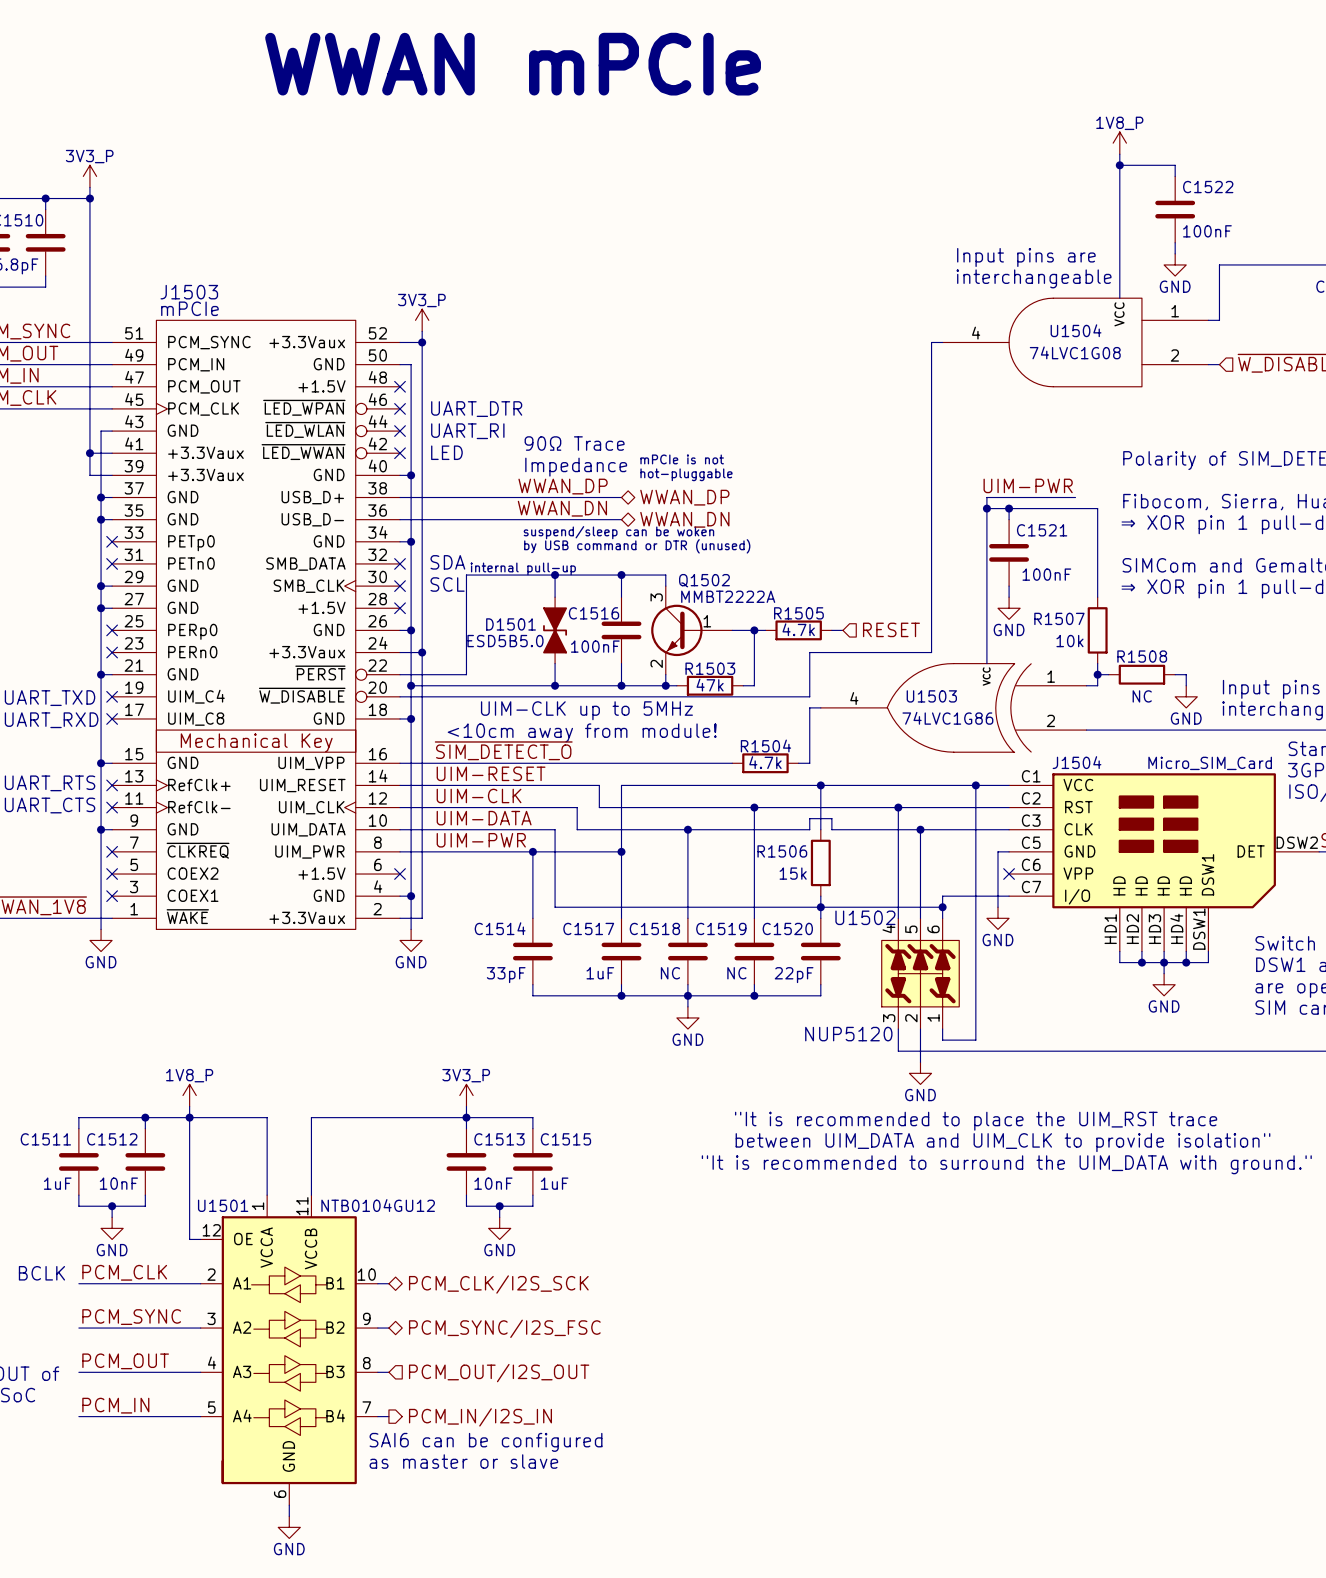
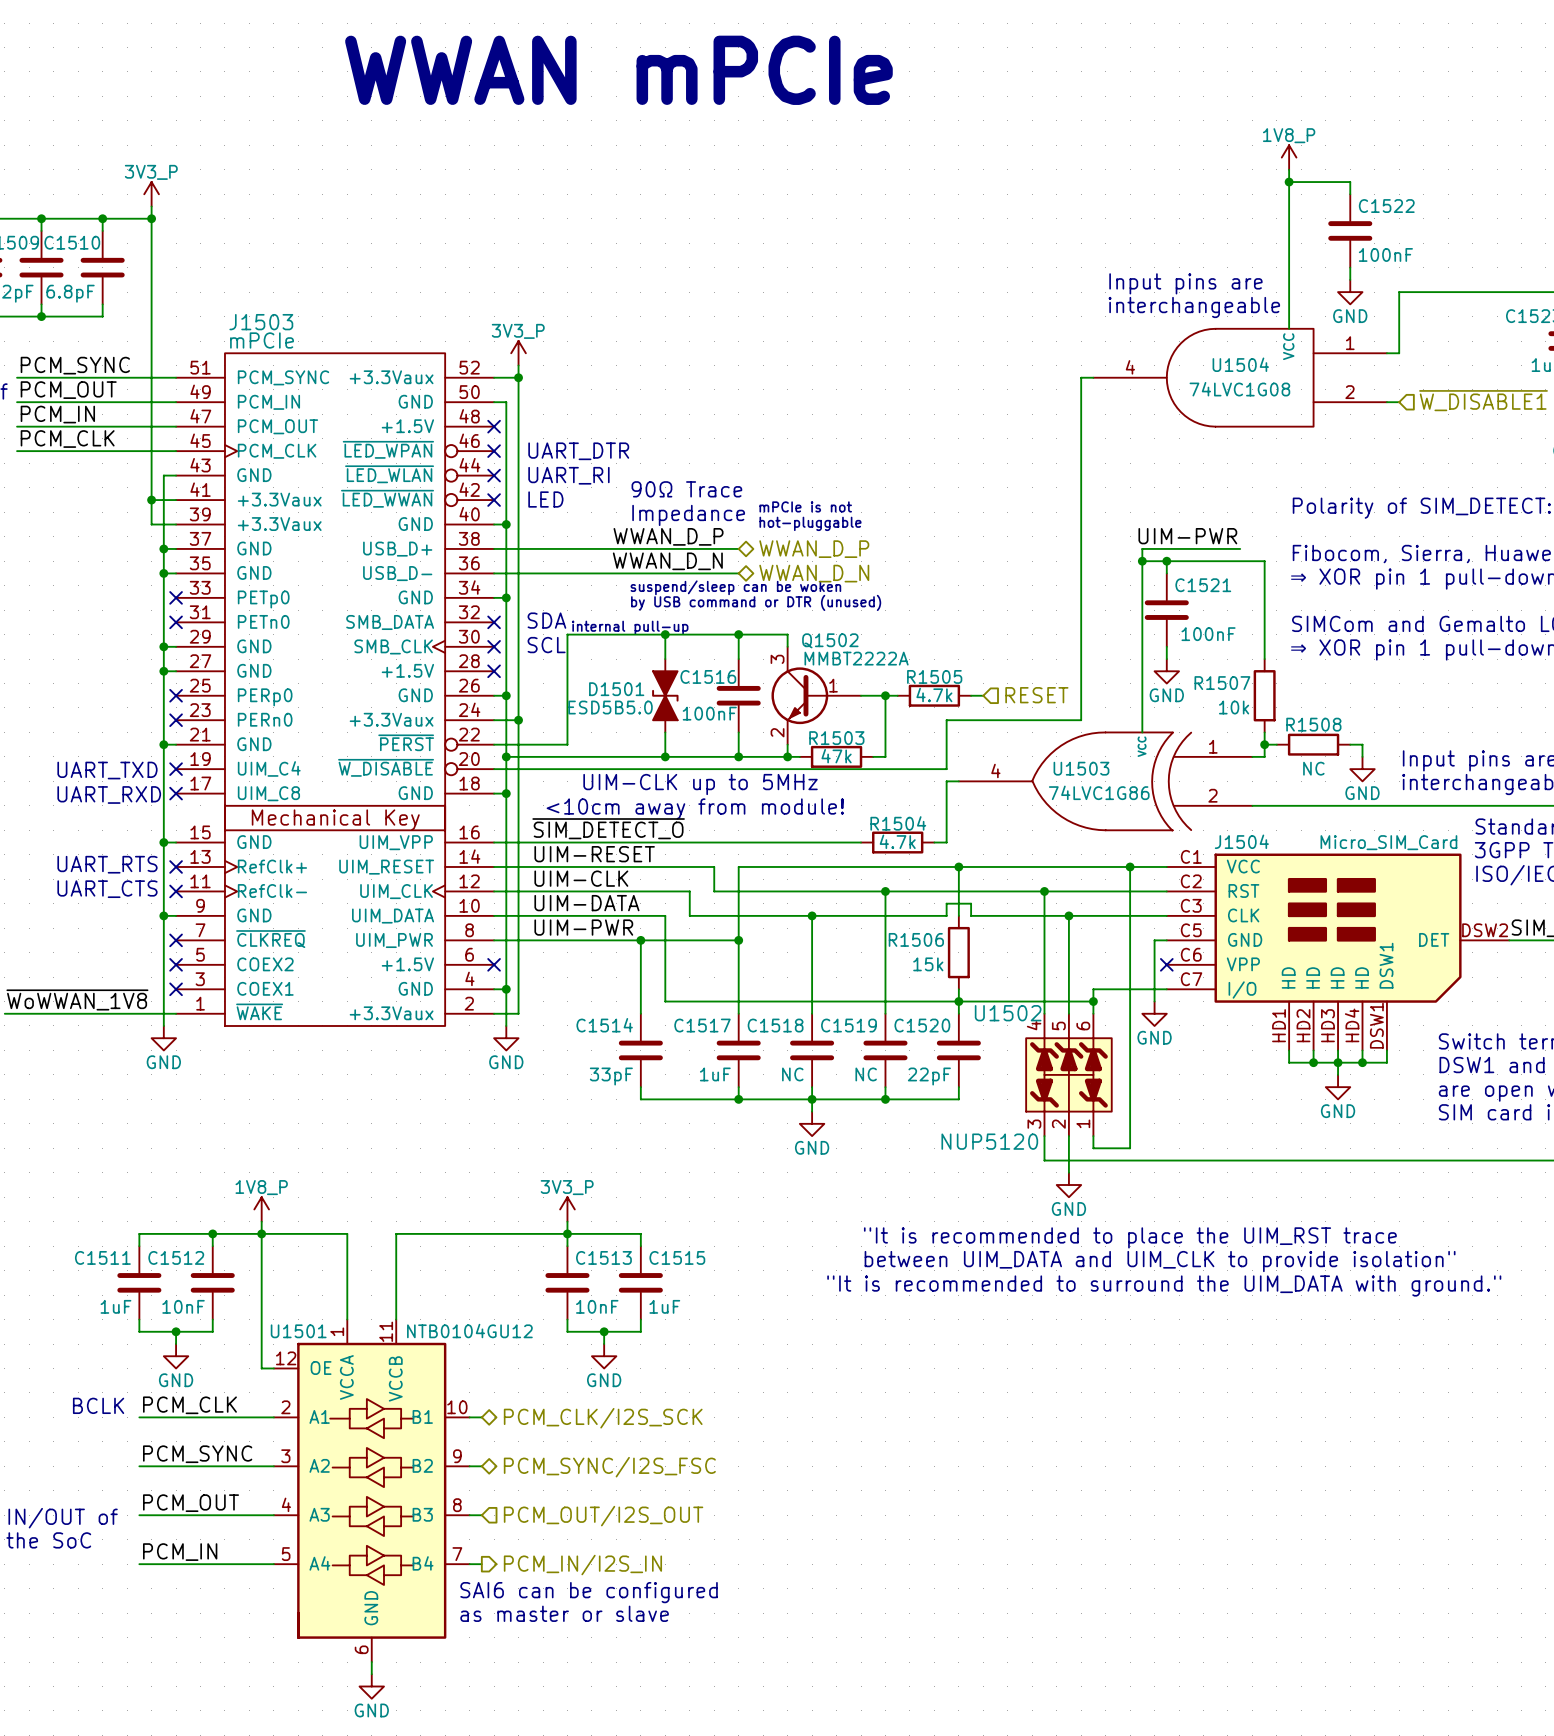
label: WWAN_DP (563, 486) -> WWAN_D_P (668, 536)
hierarchical label: WWAN_DP (684, 497) -> WWAN_D_P (814, 549)
label: WWAN_DN (562, 508) -> WWAN_D_N (667, 561)
hierarchical label: WWAN_DN (684, 519) -> WWAN_D_N (814, 573)

